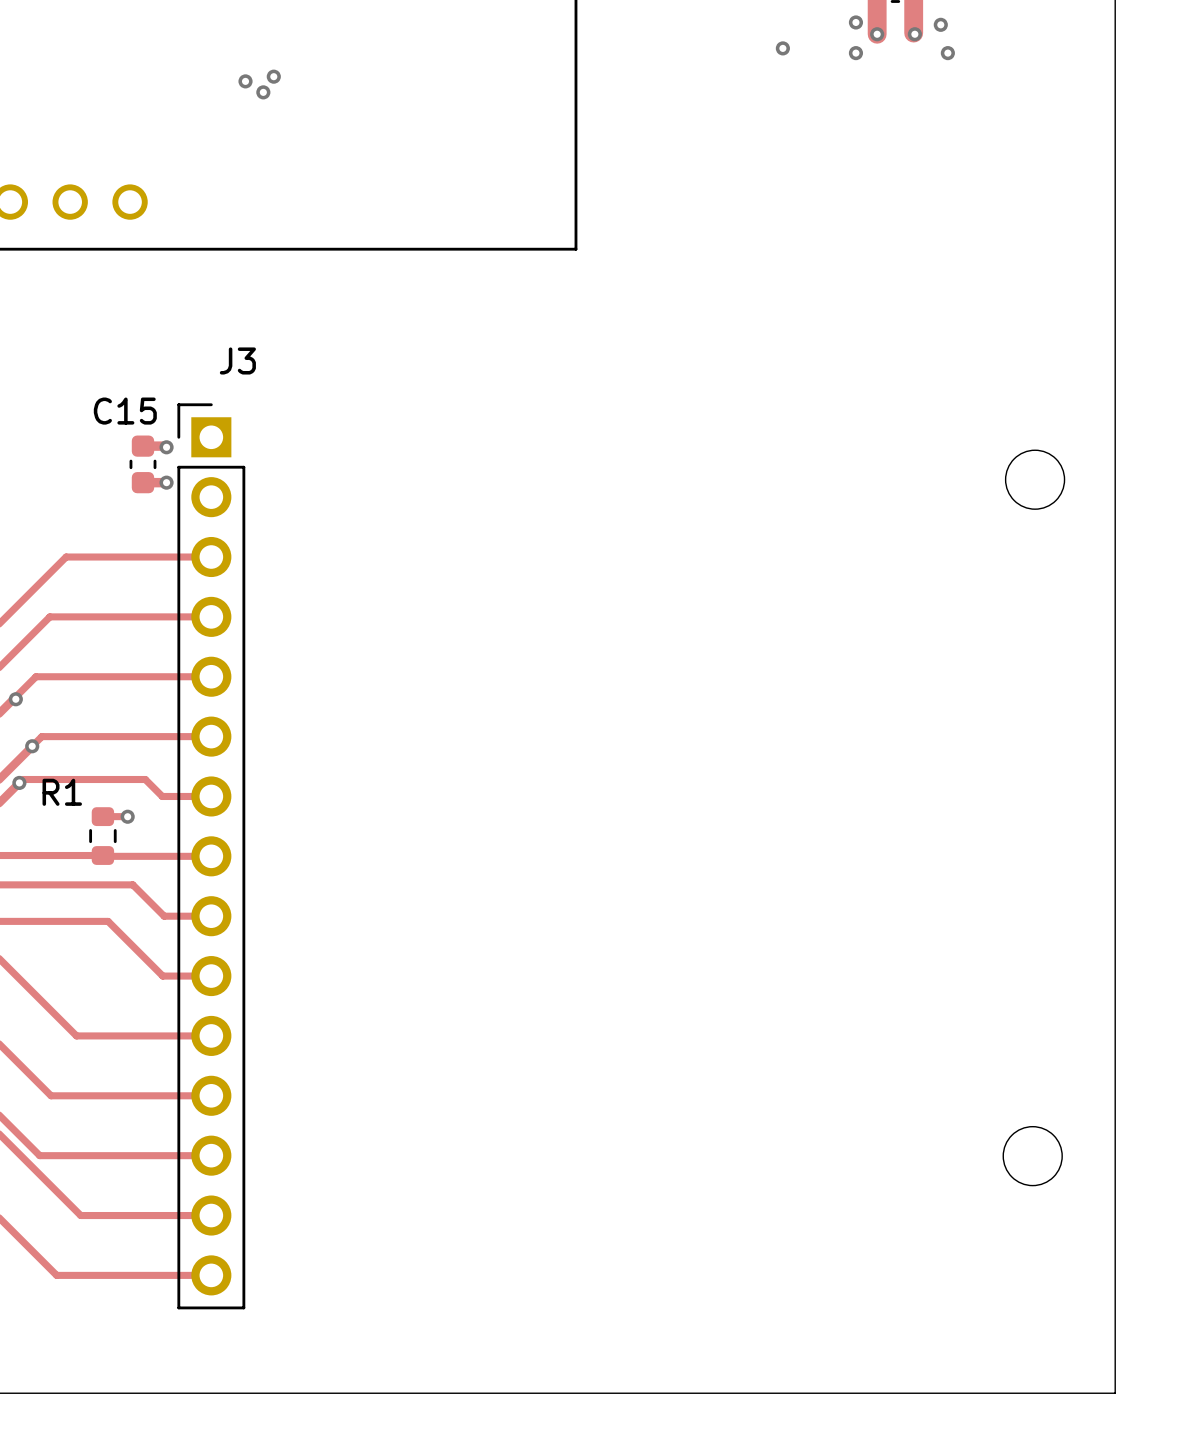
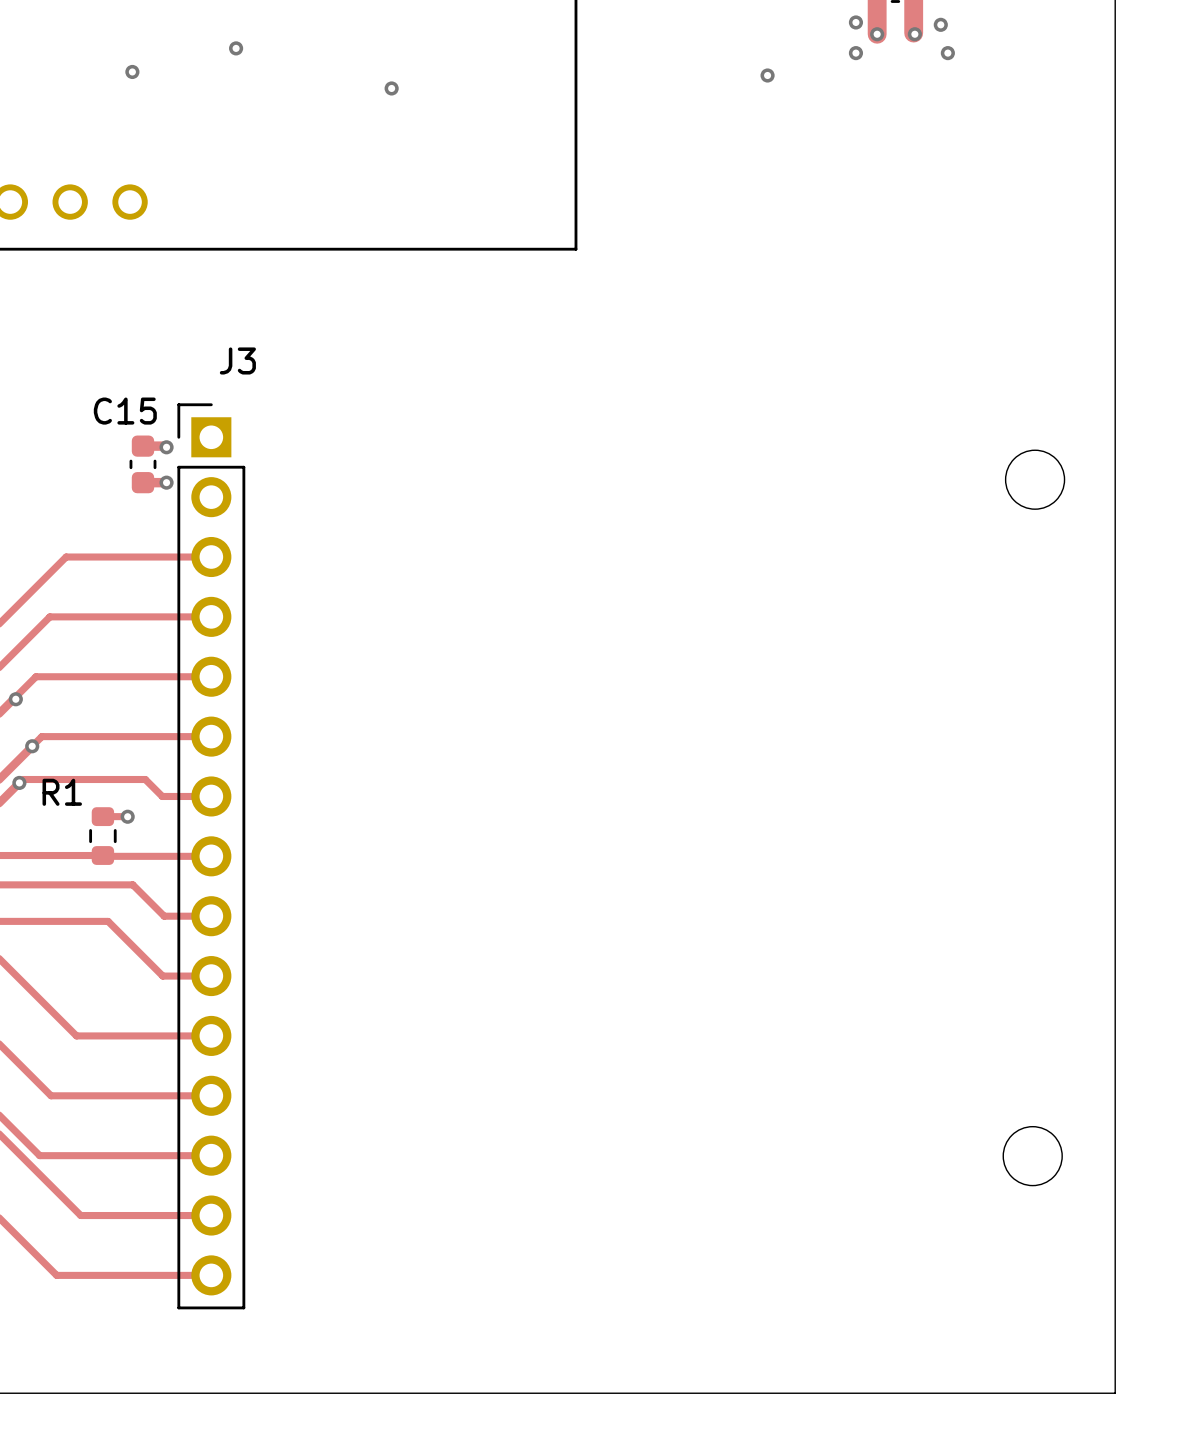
via: none -> (236, 48)
via position: (782, 48) -> (767, 75)
via: none -> (132, 71)
via: (273, 76) -> none
via: (245, 81) -> none
via: none -> (391, 88)
via: (263, 92) -> none

